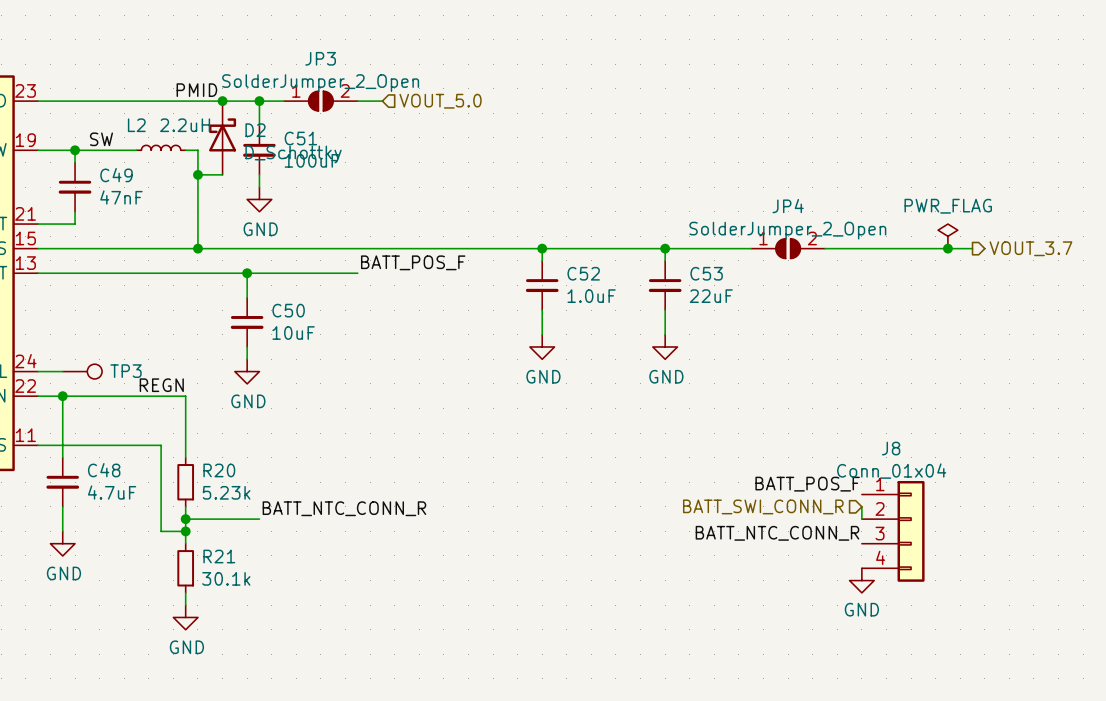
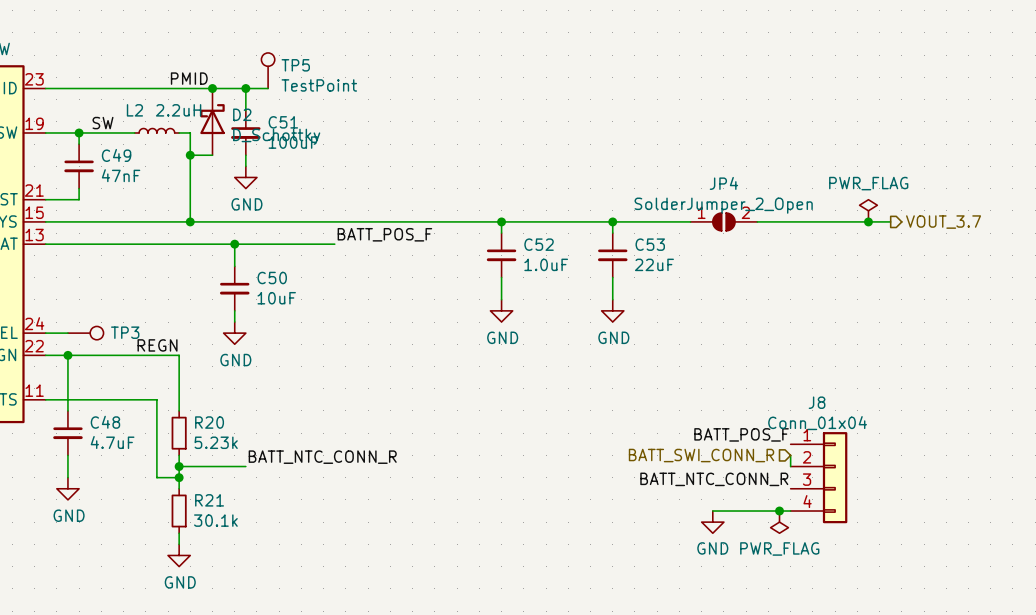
TP5: none -> TestPoint (268, 70)
JP3: SolderJumper_2_Open (320, 101) -> none
wire: (357, 101) (382, 101) -> none
hierarchical label: VOUT_5.0 (440, 101) -> none
wire: none -> (712, 511) (790, 511)
junction: none -> (779, 511)
power symbol: none -> PWR_FLAG (779, 522)
power symbol position: GND (861, 580) -> GND (712, 522)

